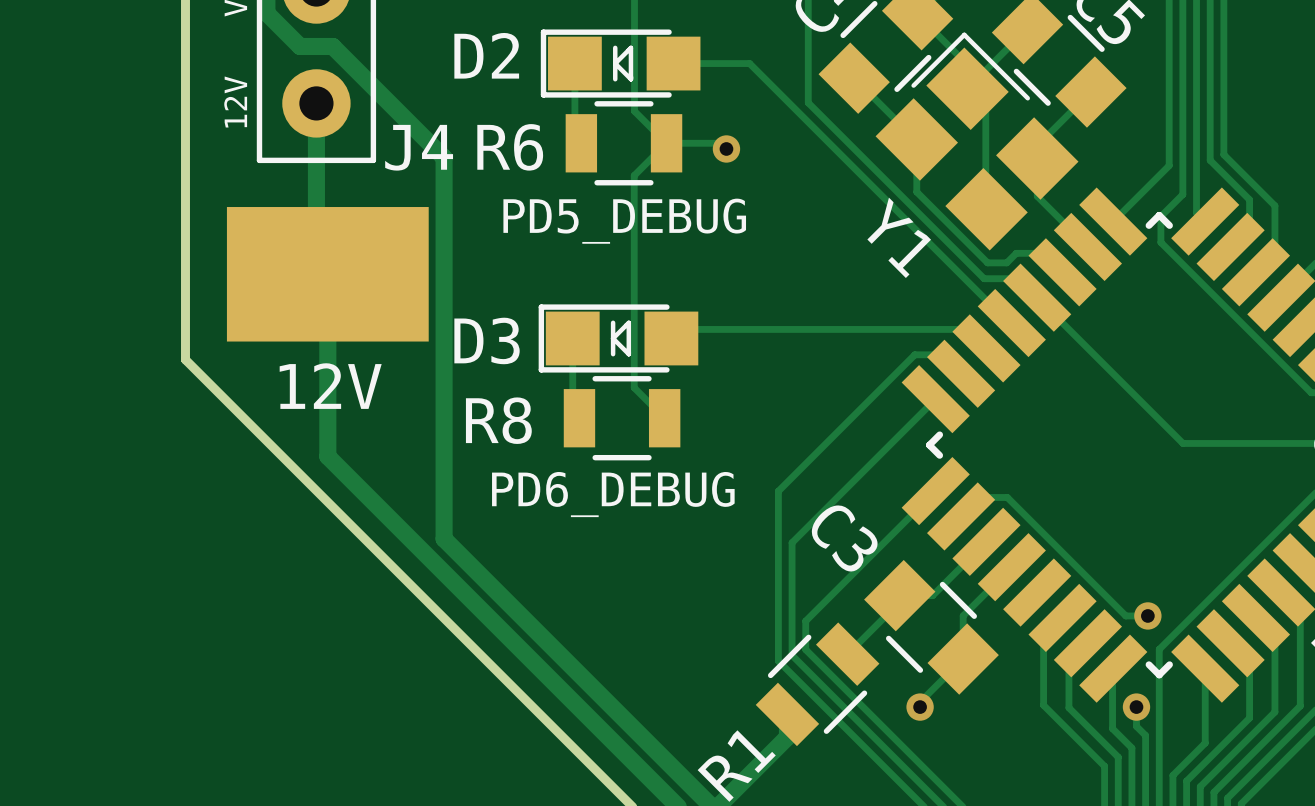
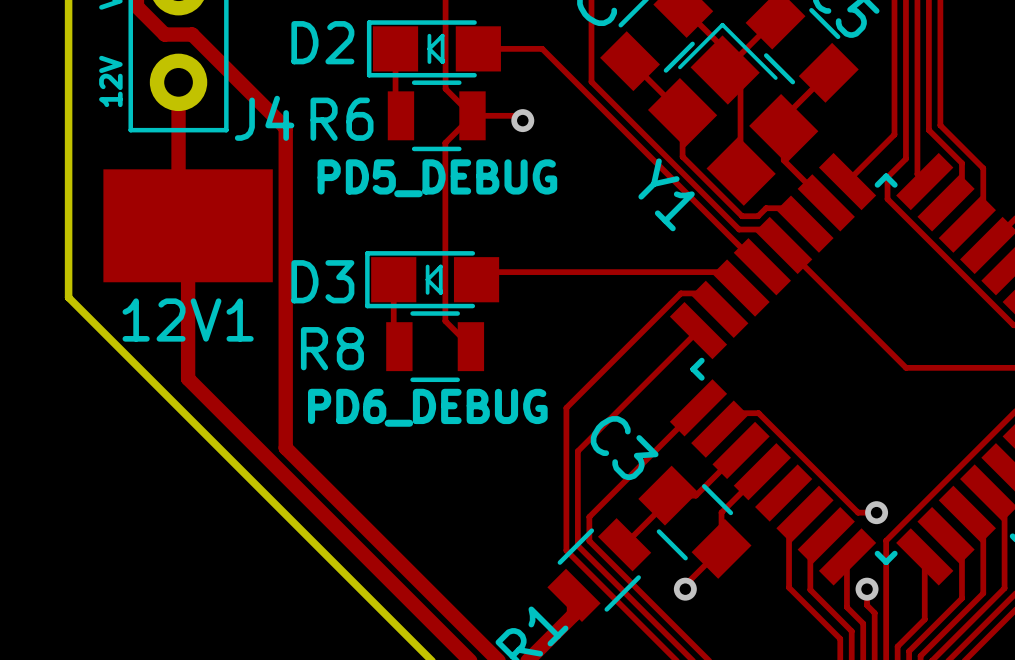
12V name: 12V (330, 386) -> 12V1 (188, 320)

